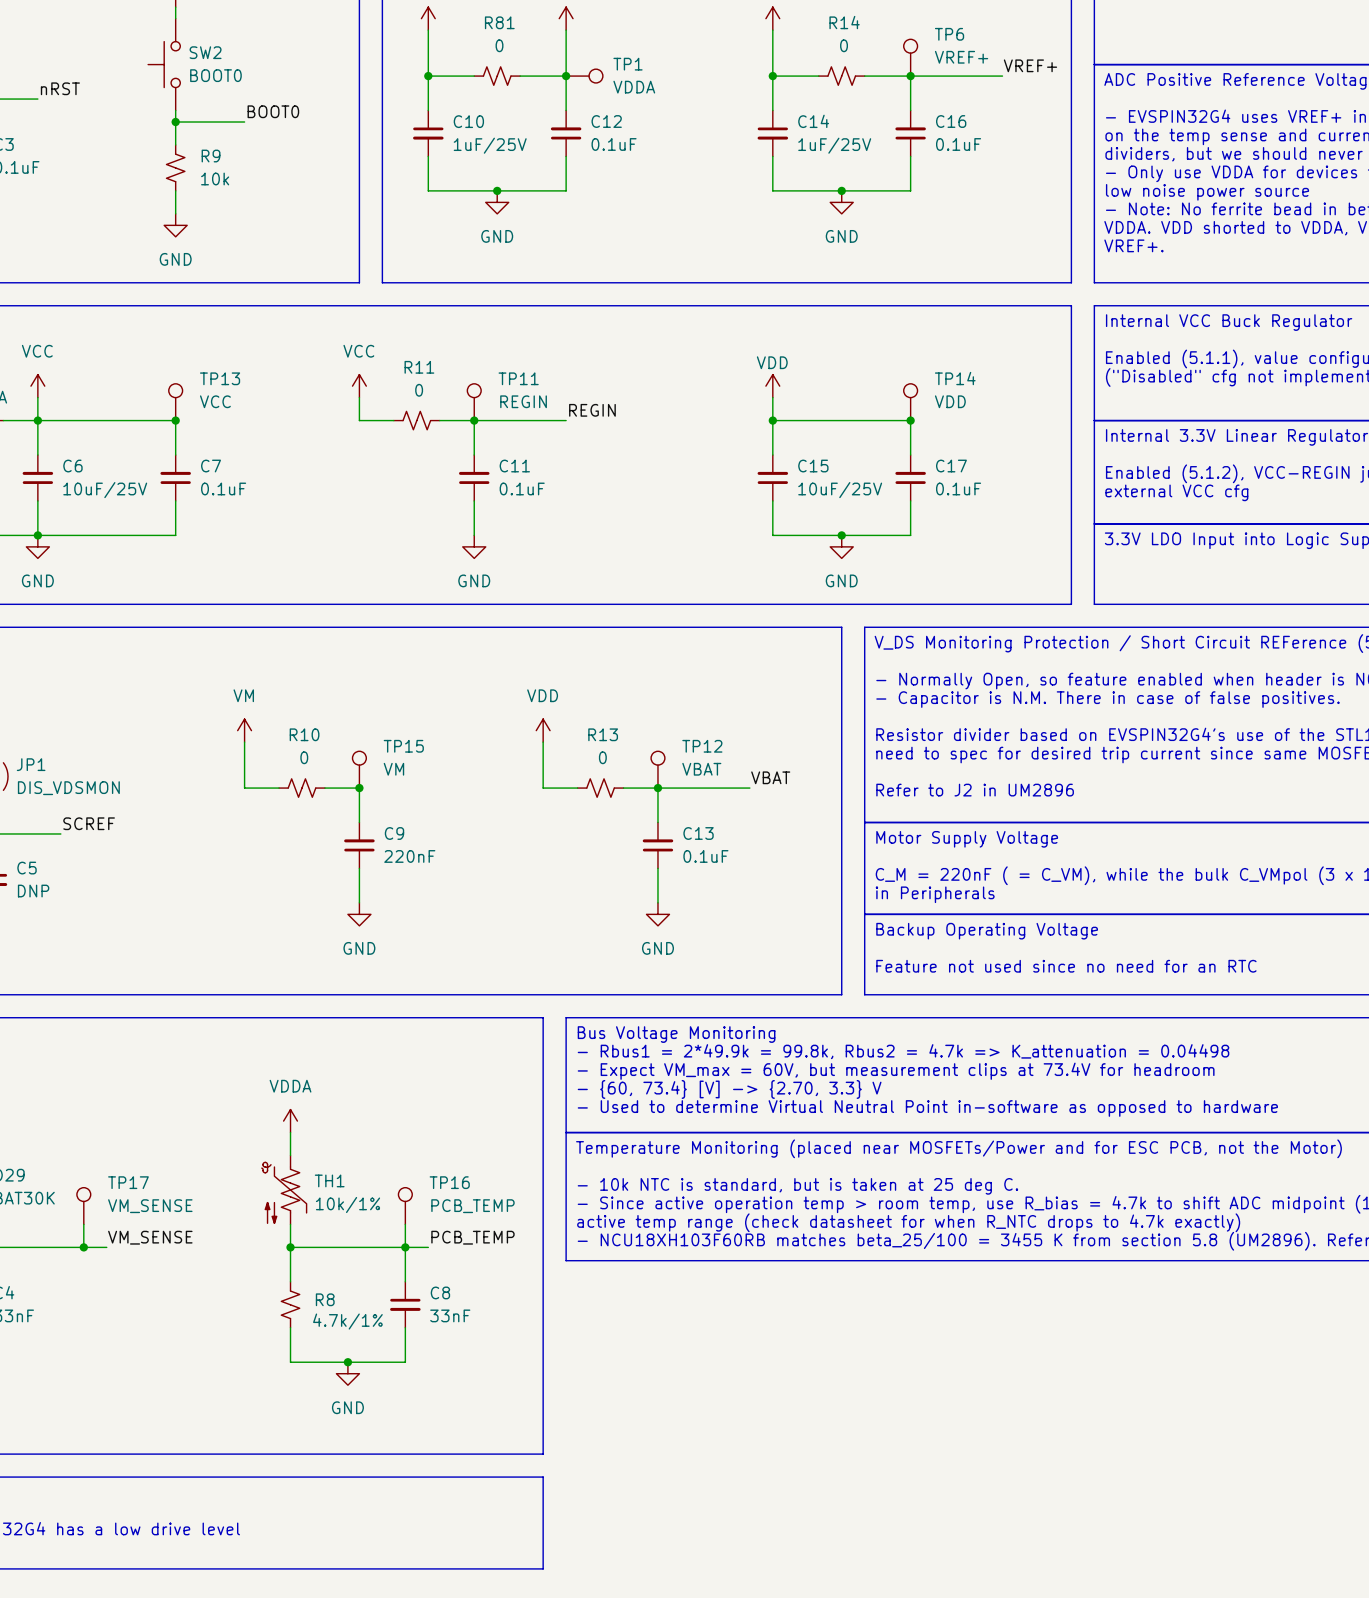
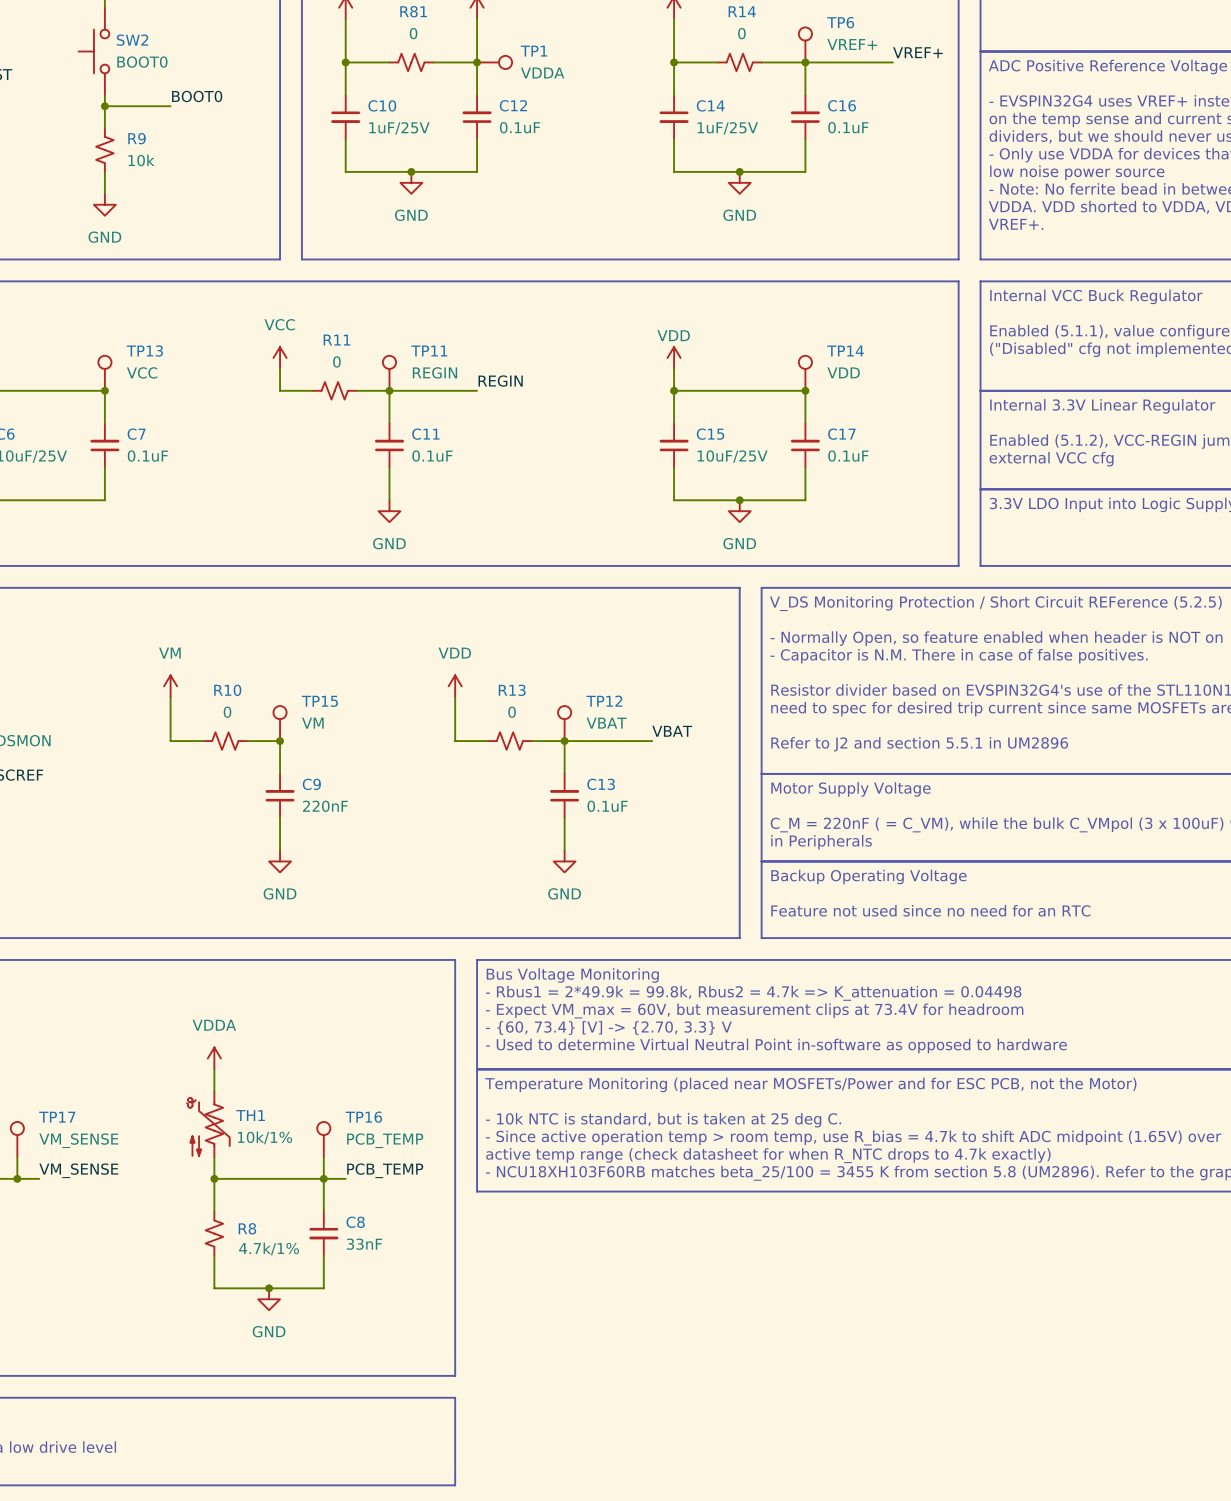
text: Refer to J2 in UM2896 (975, 790) -> Refer to J2 and section 5.5.1 in UM2896 (919, 744)

